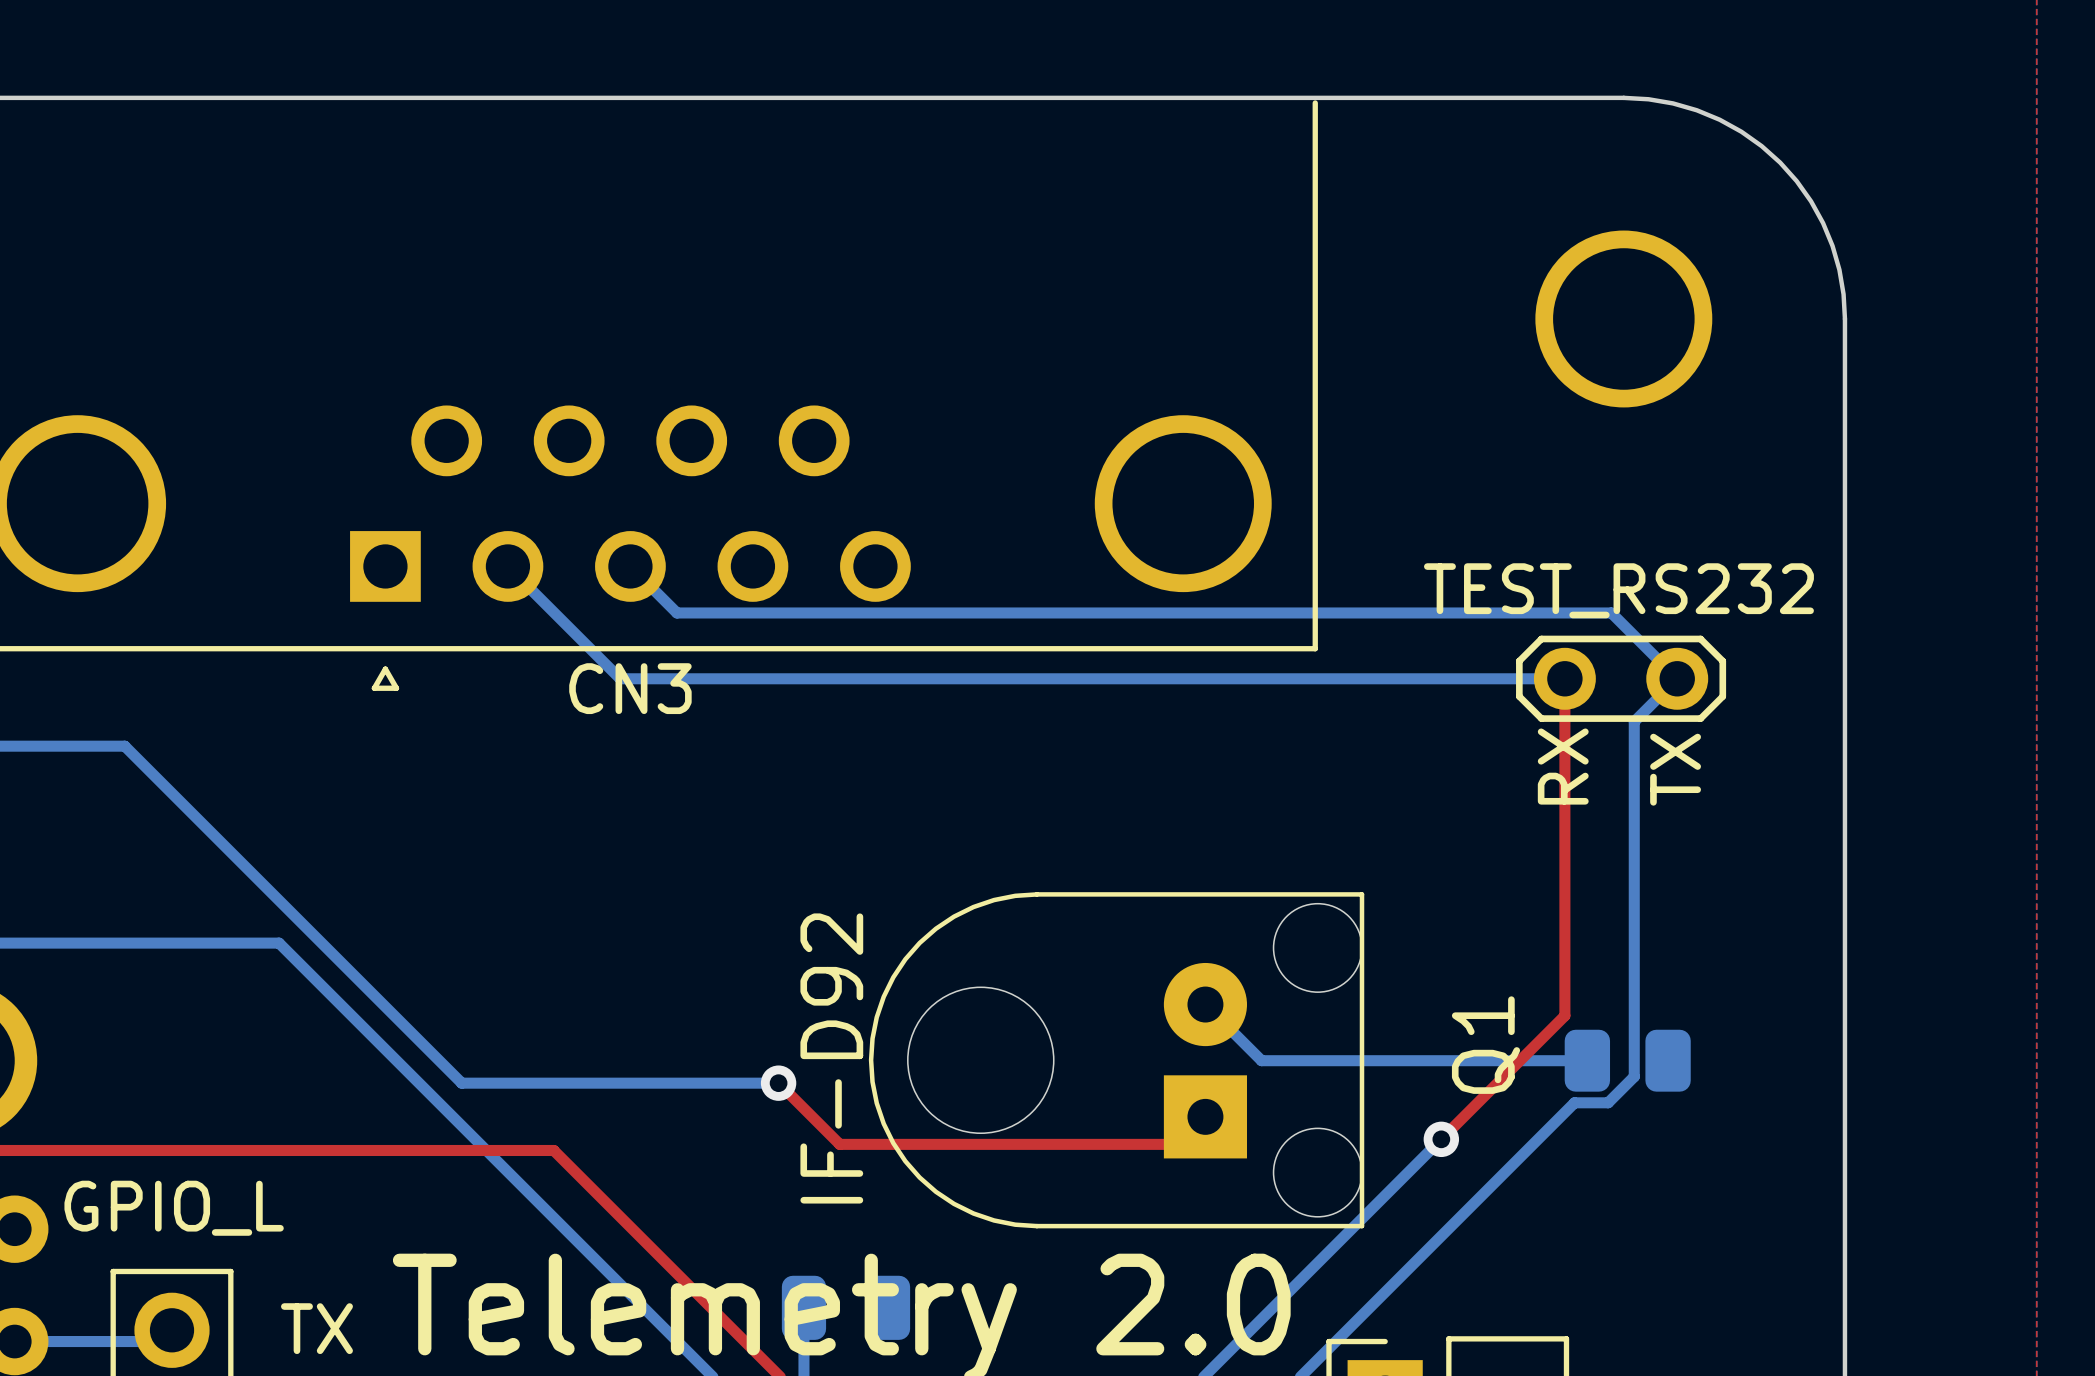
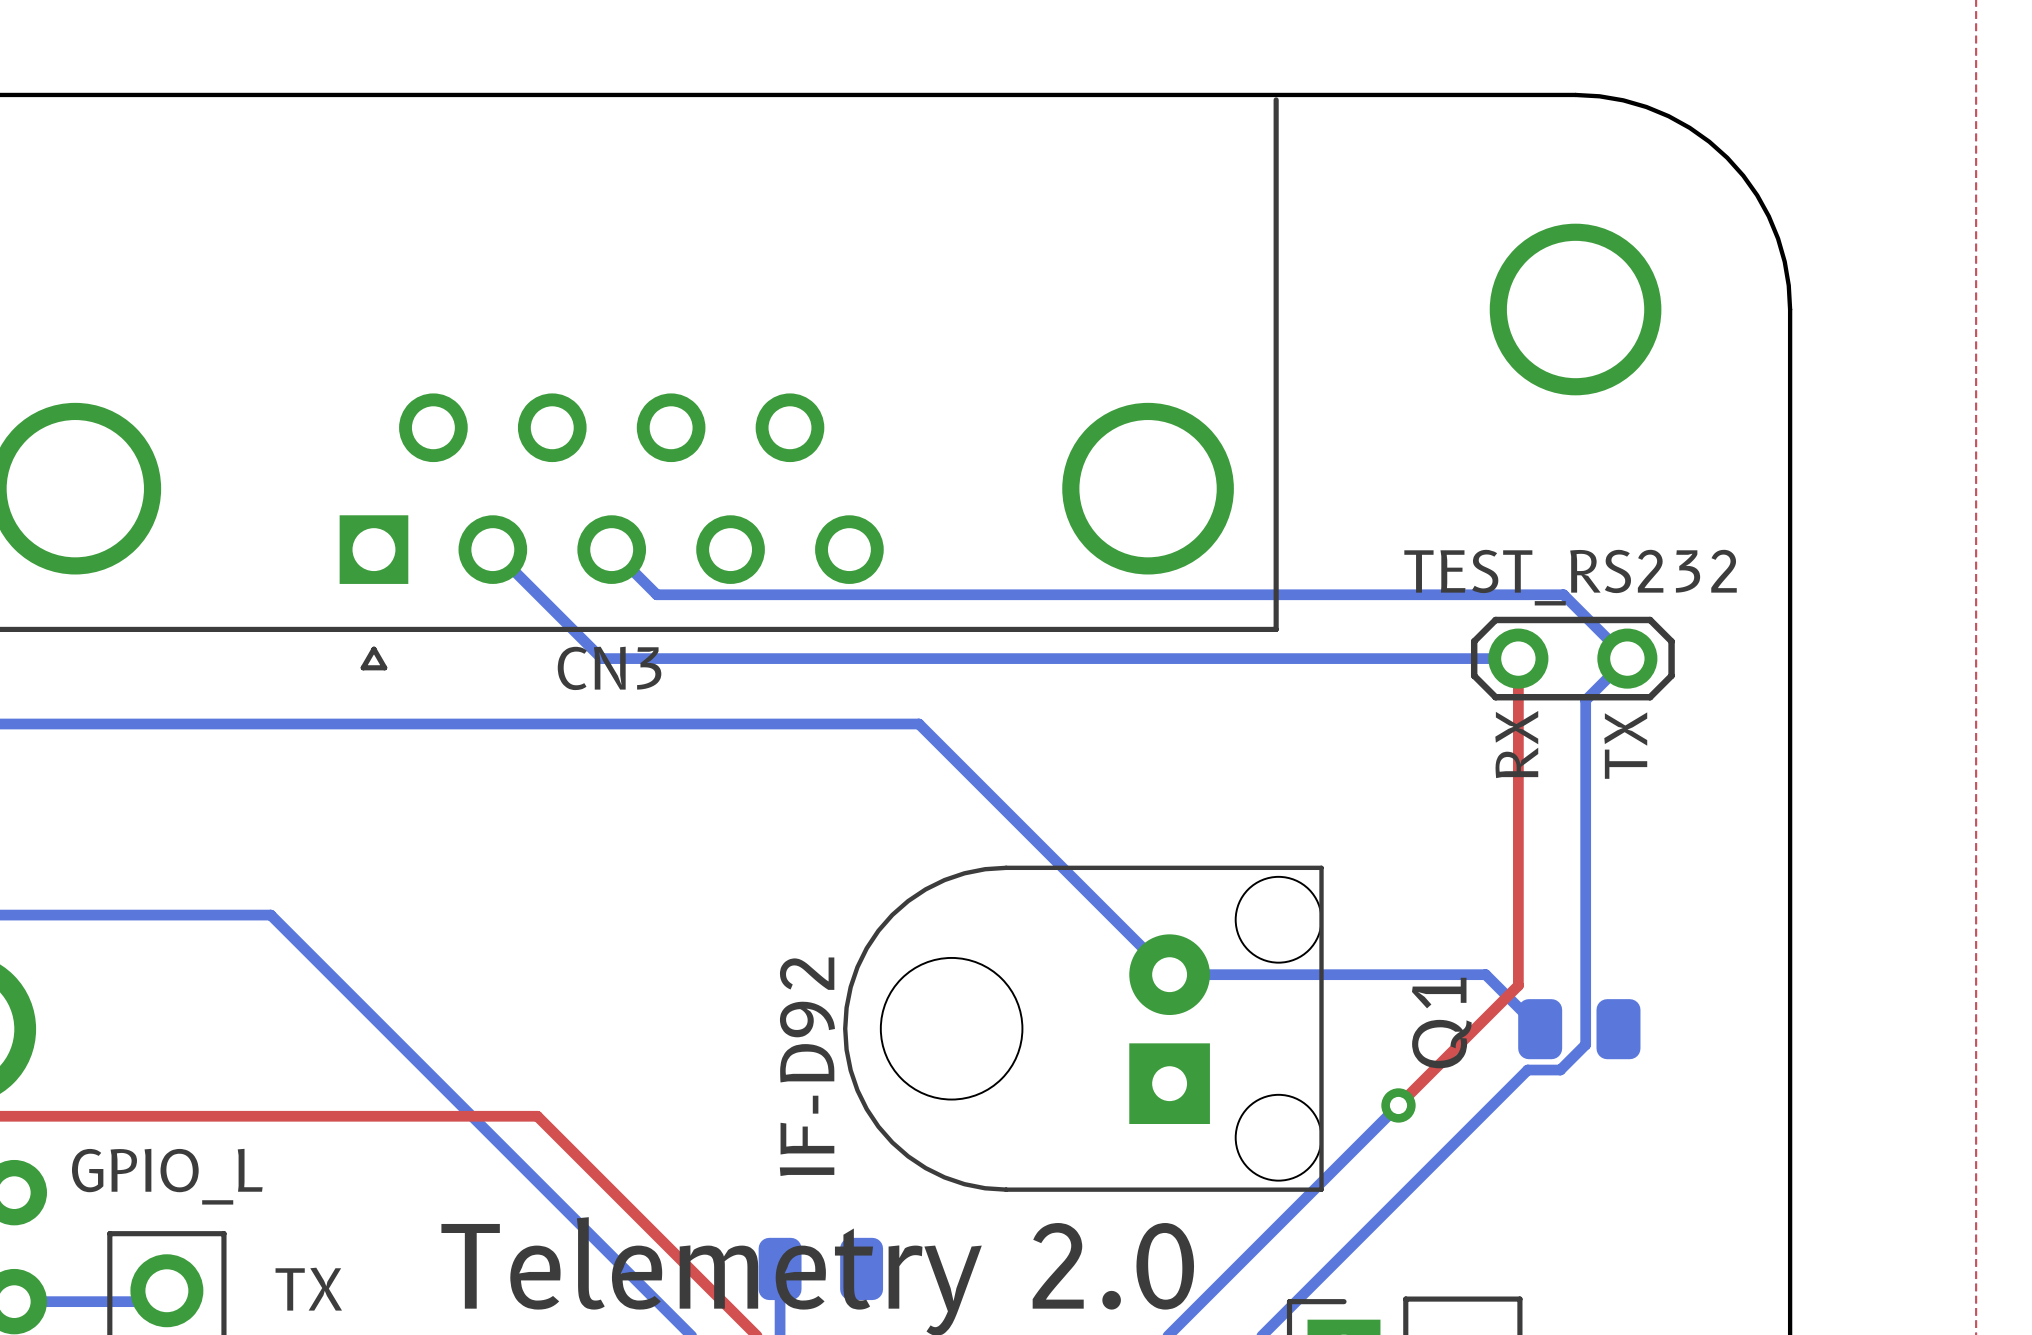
bottom track: (124, 746) (461, 1083) (778, 1083) -> (121, 723) (918, 723) (1169, 974) (1485, 974) (1540, 1029)
bottom track: (1205, 1004) (1261, 1060) (1587, 1060) -> none
top track: (778, 1083) (839, 1144) (1177, 1144) -> none
via: (778, 1083) -> none

